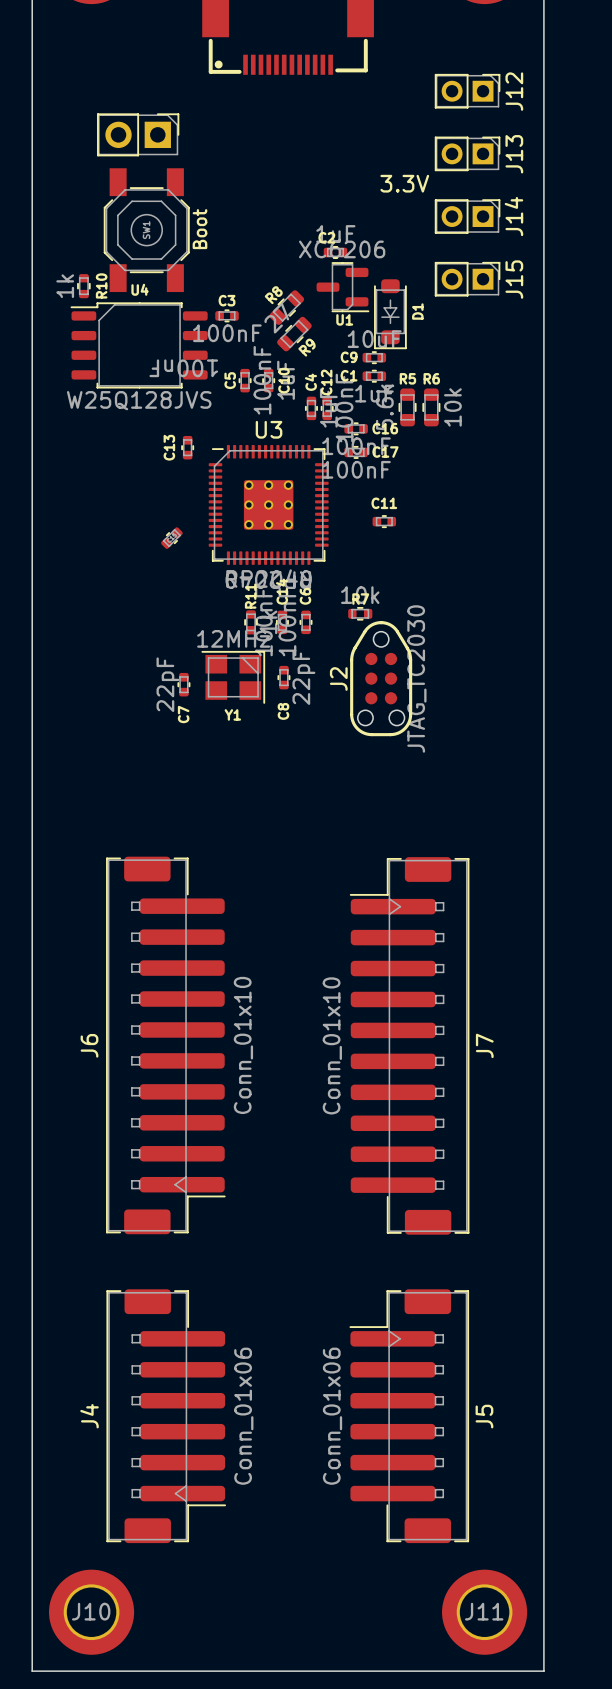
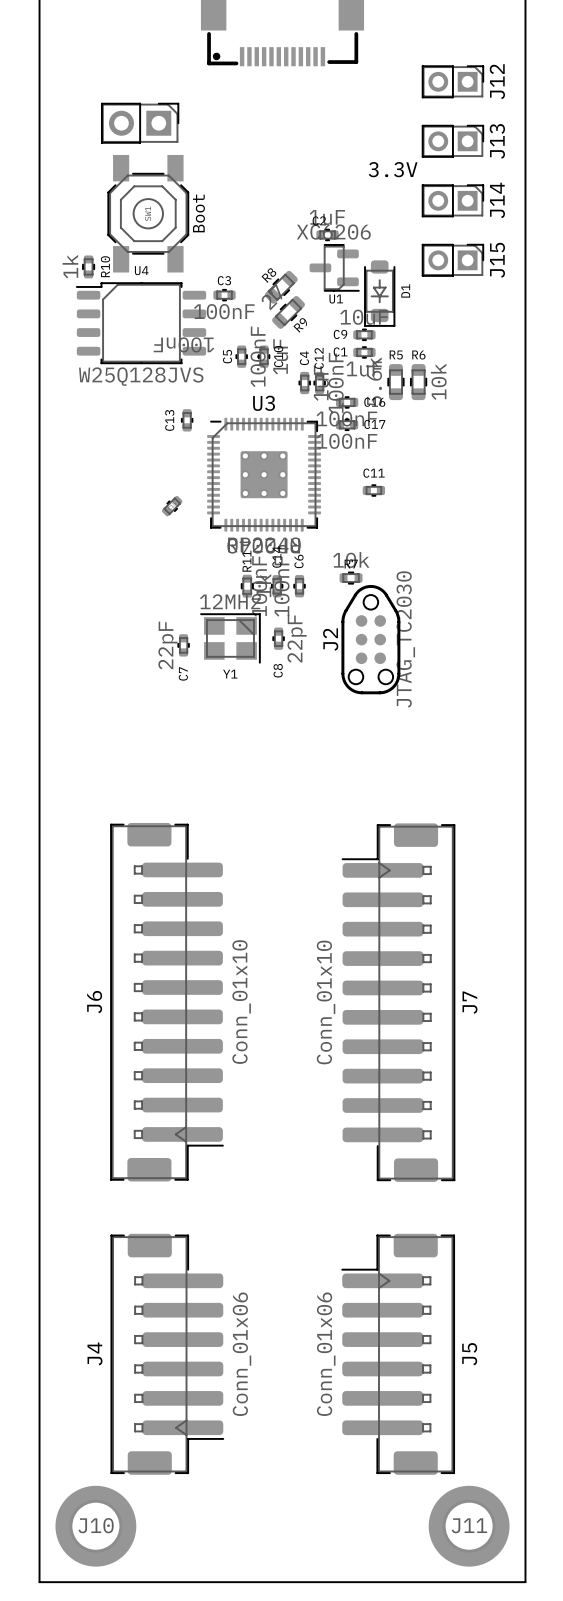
J6 position: (165, 1045) -> (166, 1002)
J7 position: (409, 1045) -> (398, 1002)
J4 position: (166, 1416) -> (167, 1354)
text position: Conn_01x06 (332, 1416) -> Conn_01x06 (326, 1354)
J5 position: (409, 1416) -> (398, 1354)

